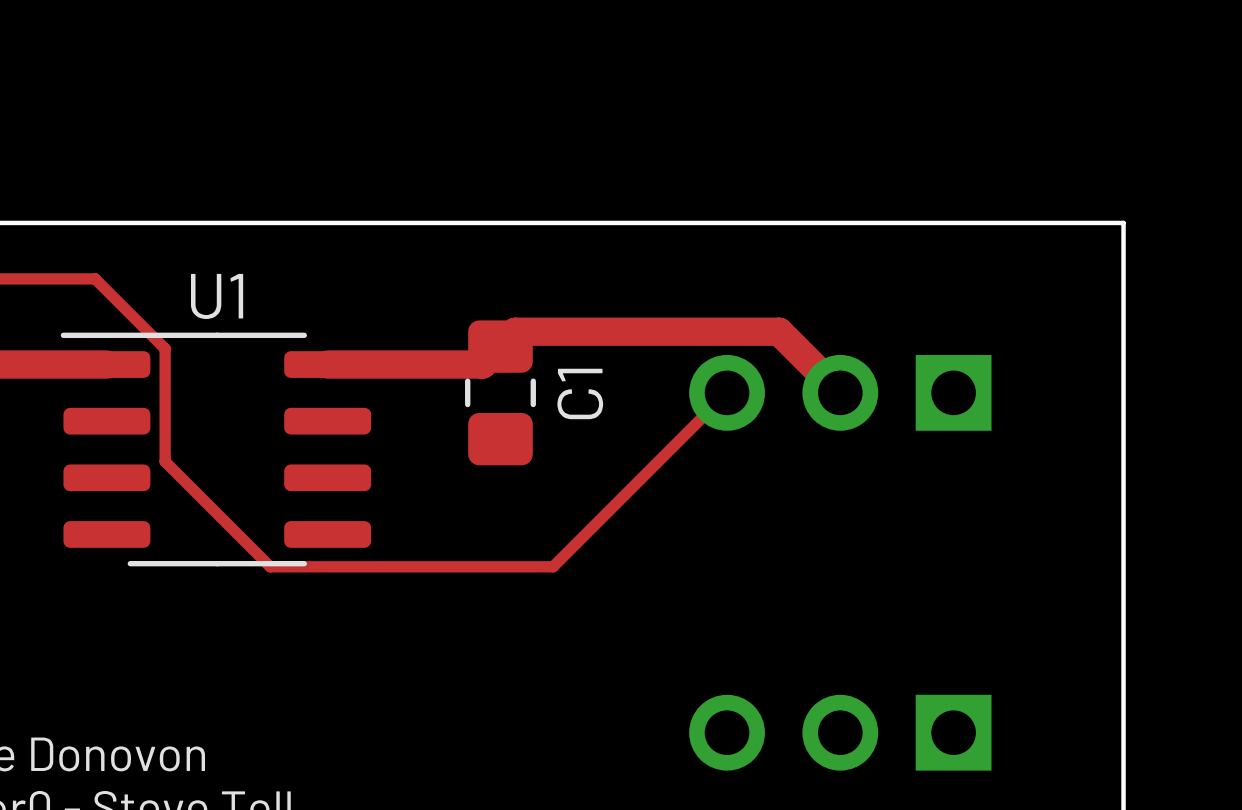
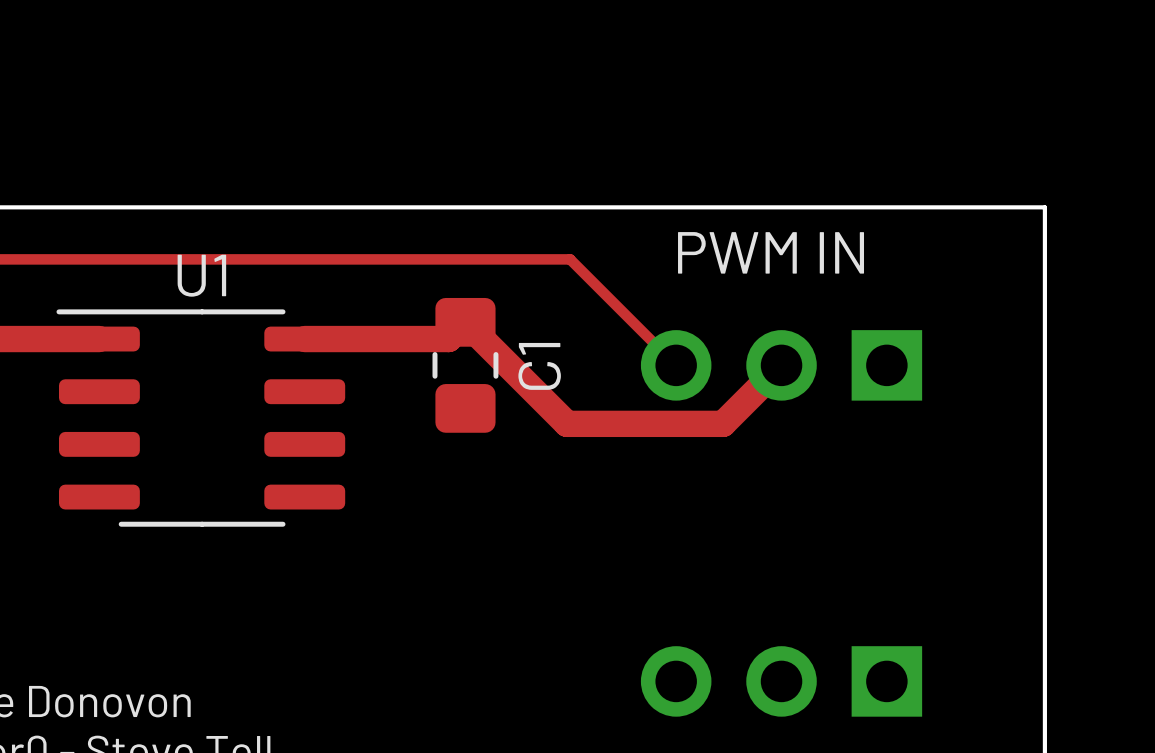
text: none -> PWM IN (771, 252)
track: (95, 278) (165, 348) (165, 461) (270, 566) (553, 566) (727, 392) -> (88, 259) (570, 259) (676, 365)
track: (500, 346) (515, 331) (779, 331) (840, 392) -> (465, 322) (566, 423) (723, 423) (781, 365)

